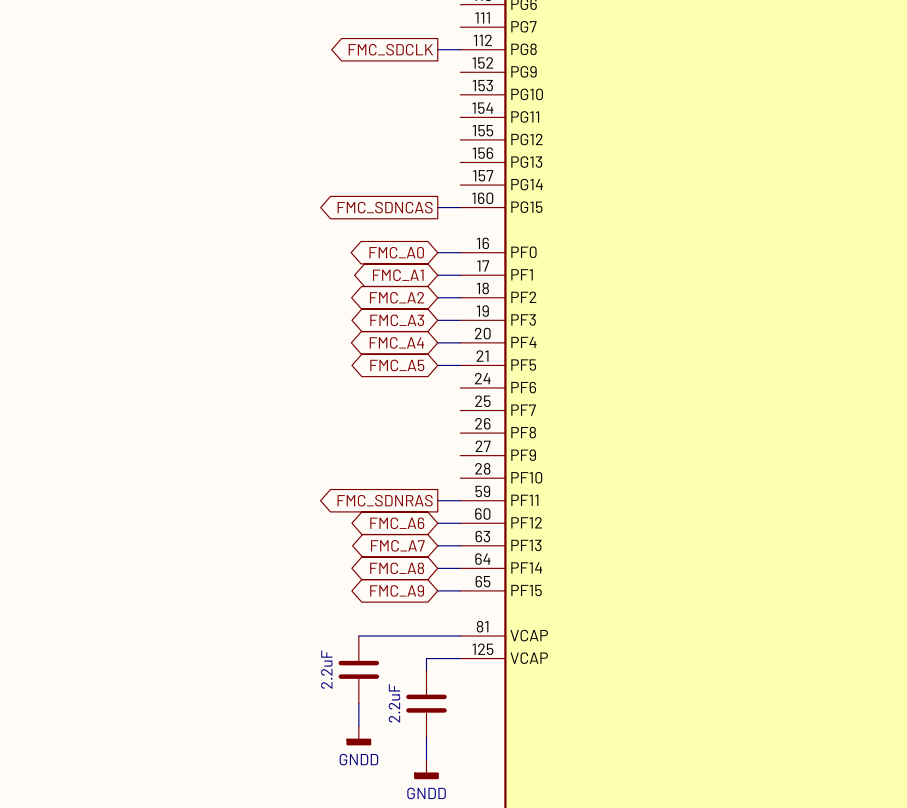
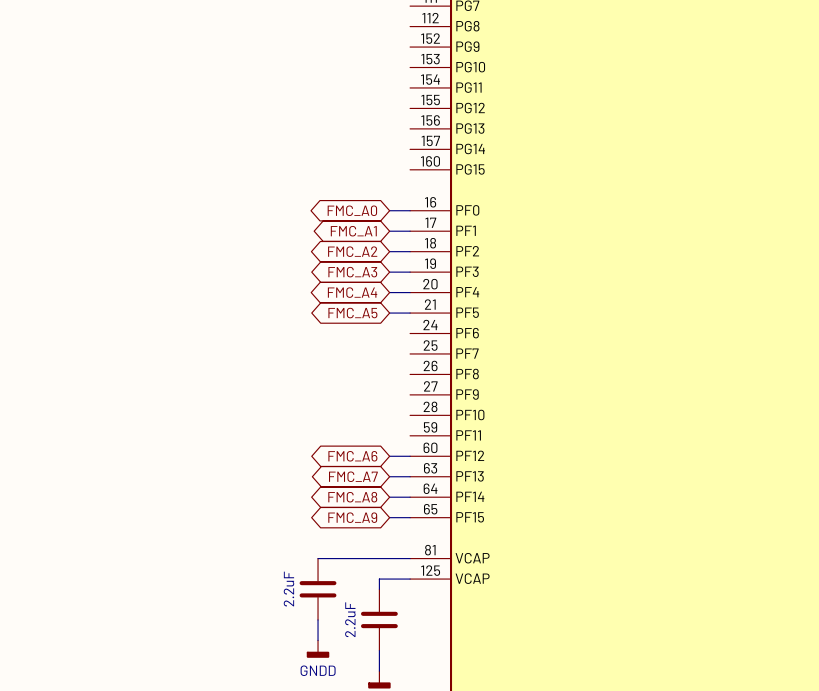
global label: FMC_SDCLK (390, 49) -> none
wire: (437, 49) (460, 49) -> none
global label: FMC_SDNCAS (385, 207) -> none
wire: (437, 207) (460, 207) -> none
global label: FMC_SDNRAS (385, 500) -> none
wire: (437, 500) (460, 500) -> none

